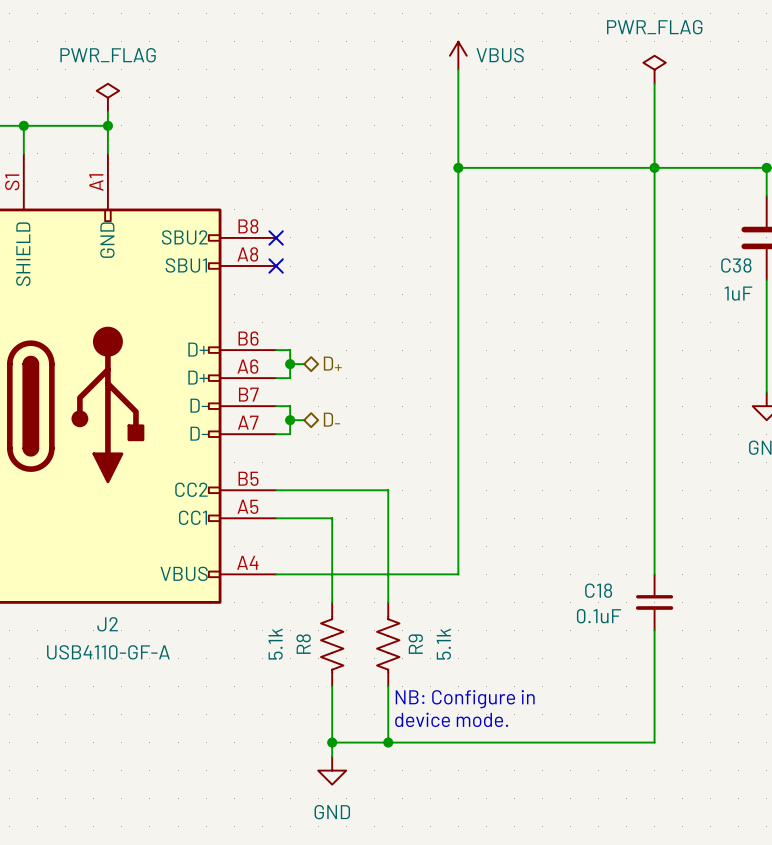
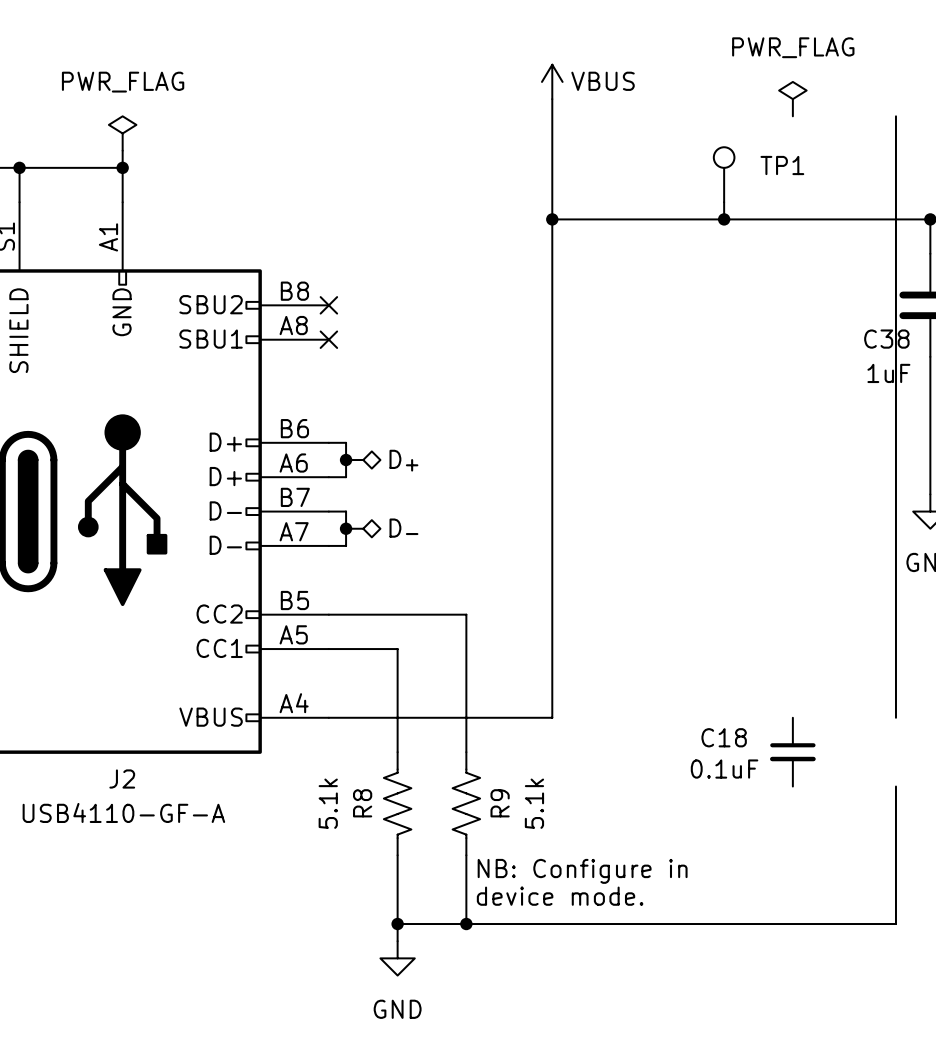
wire: (654, 83) (654, 574) -> (895, 116) (895, 717)
TP1: none -> (724, 174)
wire: none -> (724, 202) (724, 219)
junction position: (654, 167) -> (724, 219)
wire: (654, 630) (654, 742) -> (895, 786) (895, 924) (792, 924)

